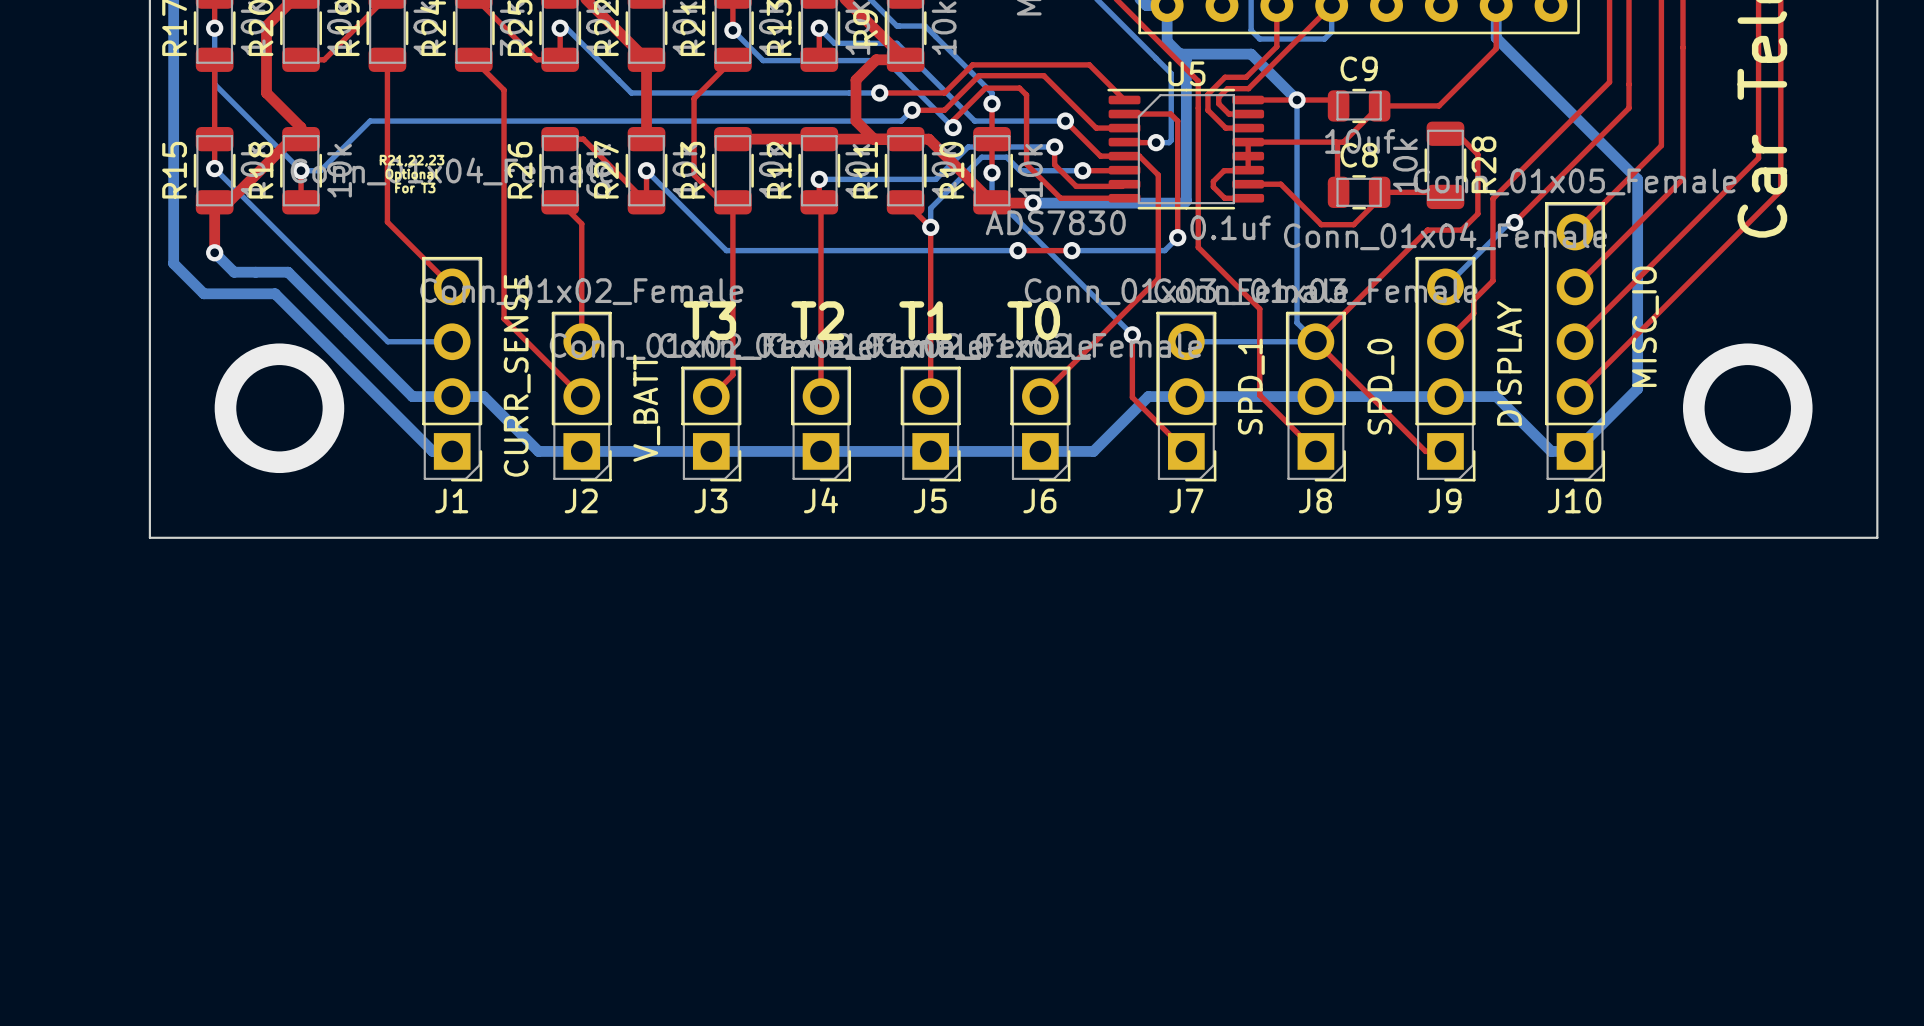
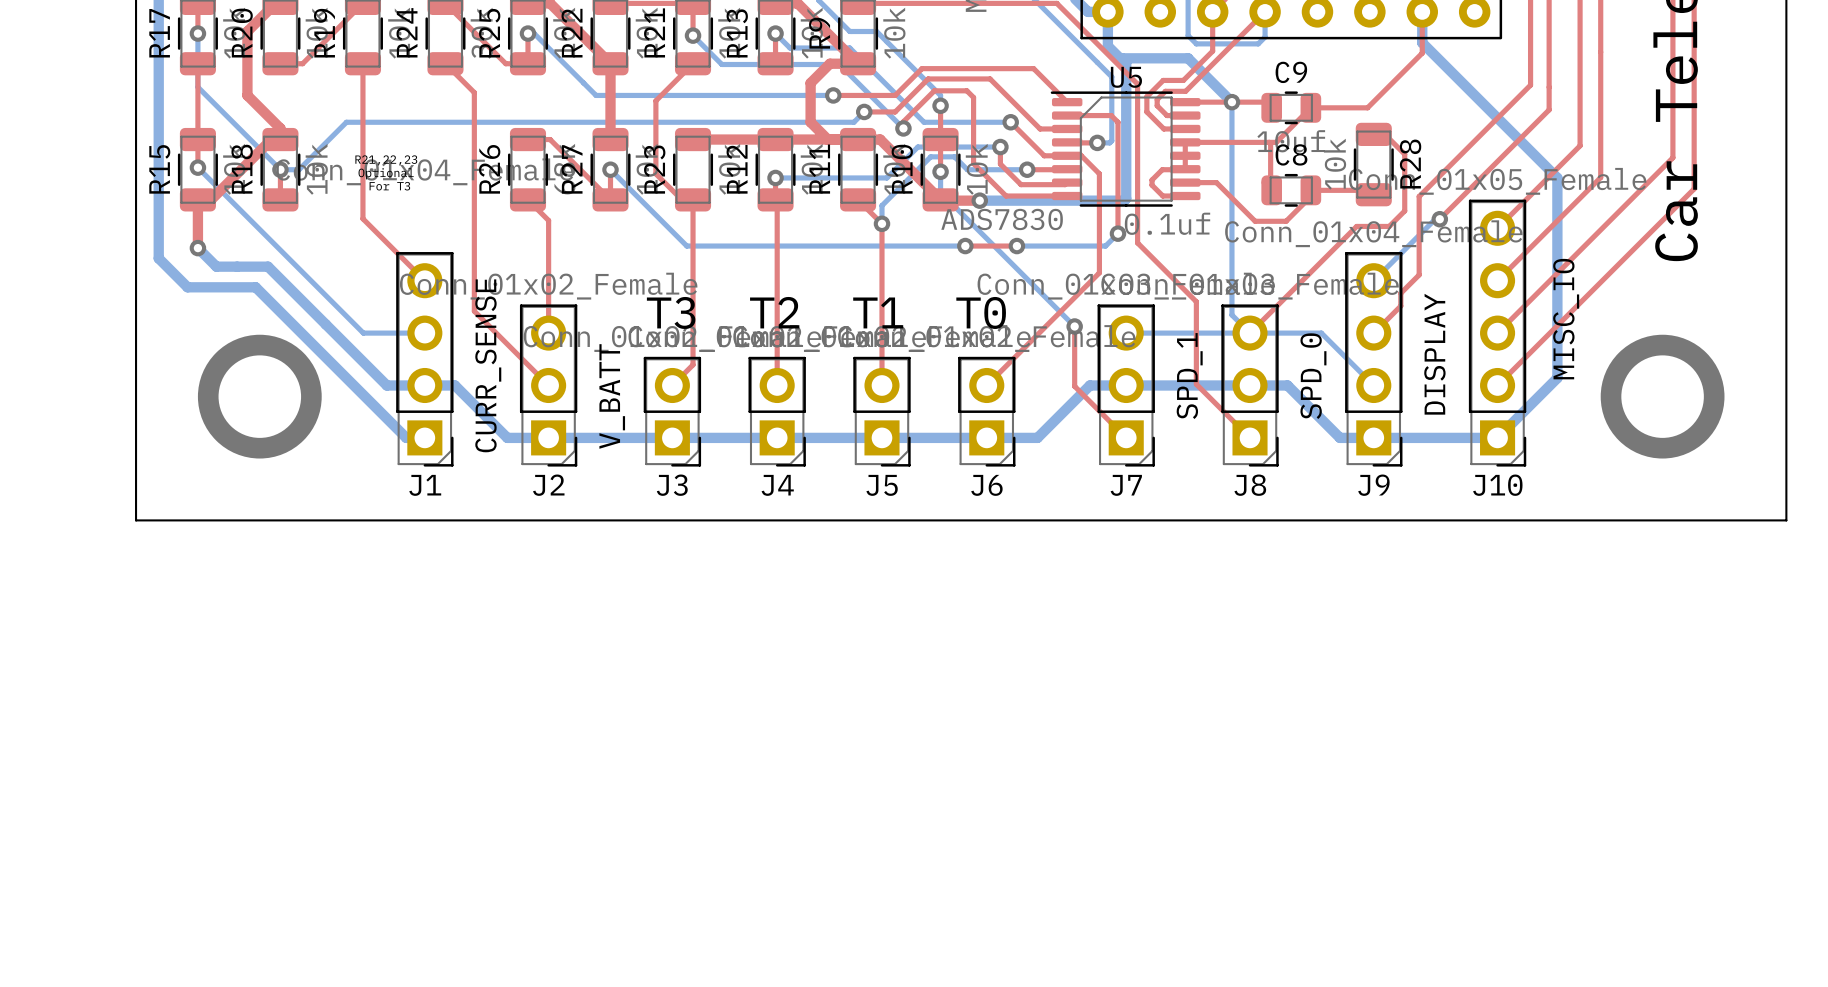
top track: (1315, 341) (1425, 451) (1445, 451) -> none
bottom track: none -> (1250, 333) (1321, 333) (1373, 385)
bottom track: (1355, 396) (1496, 396) (1551, 451) -> (1287, 385) (1339, 437) (1474, 437)

